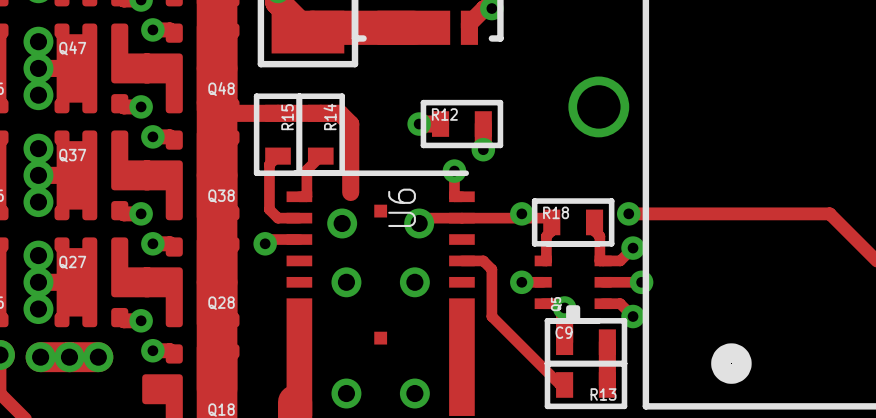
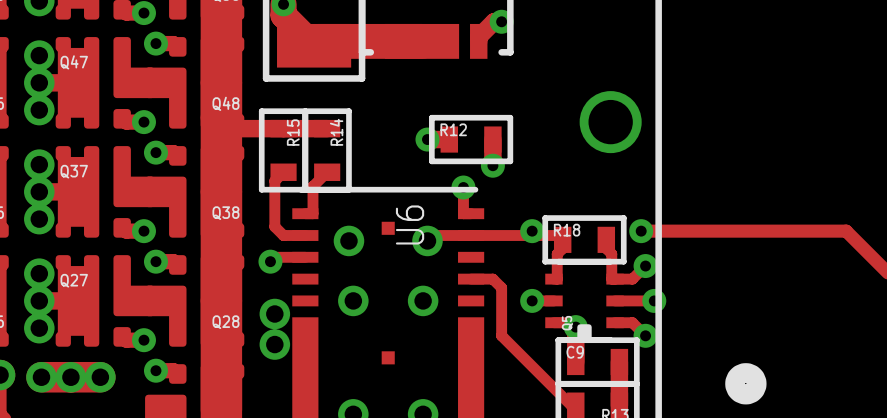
track: (320, 113) (340, 113) (350, 124) (350, 192) -> none
via: none -> (274, 314)
via: none -> (274, 344)

